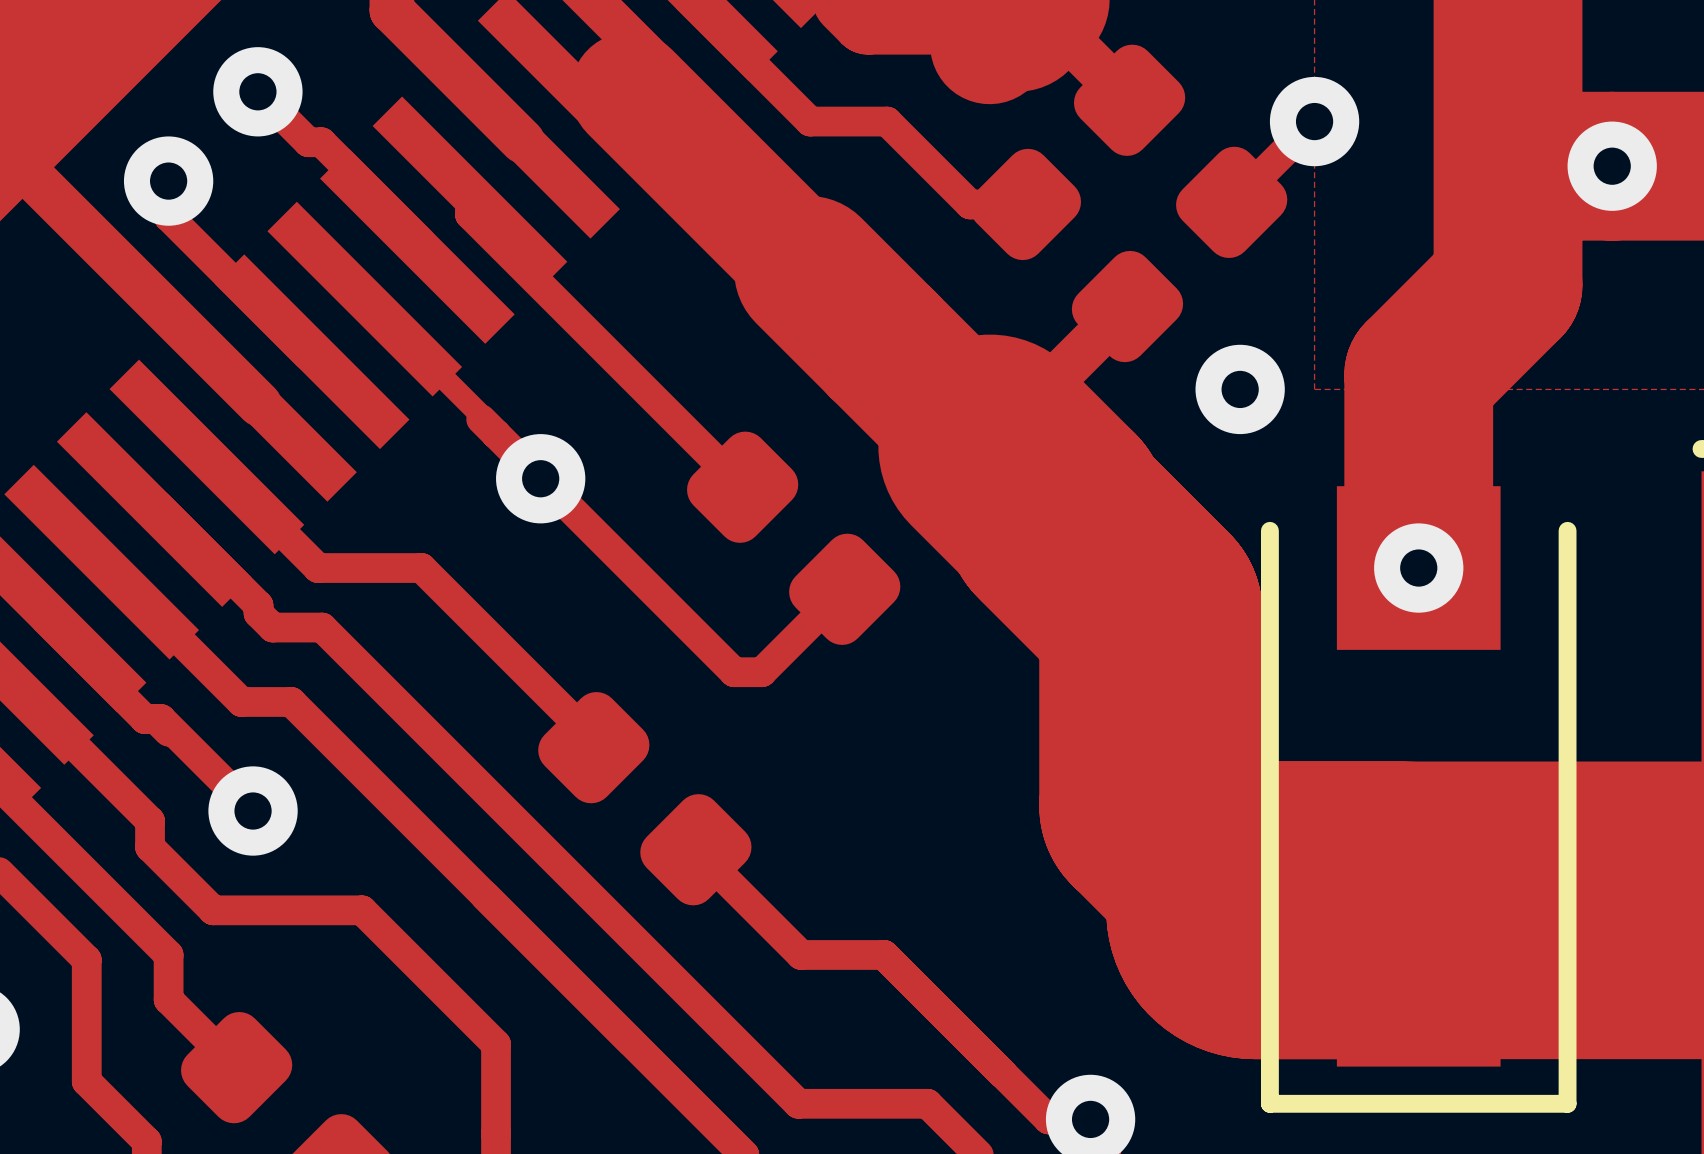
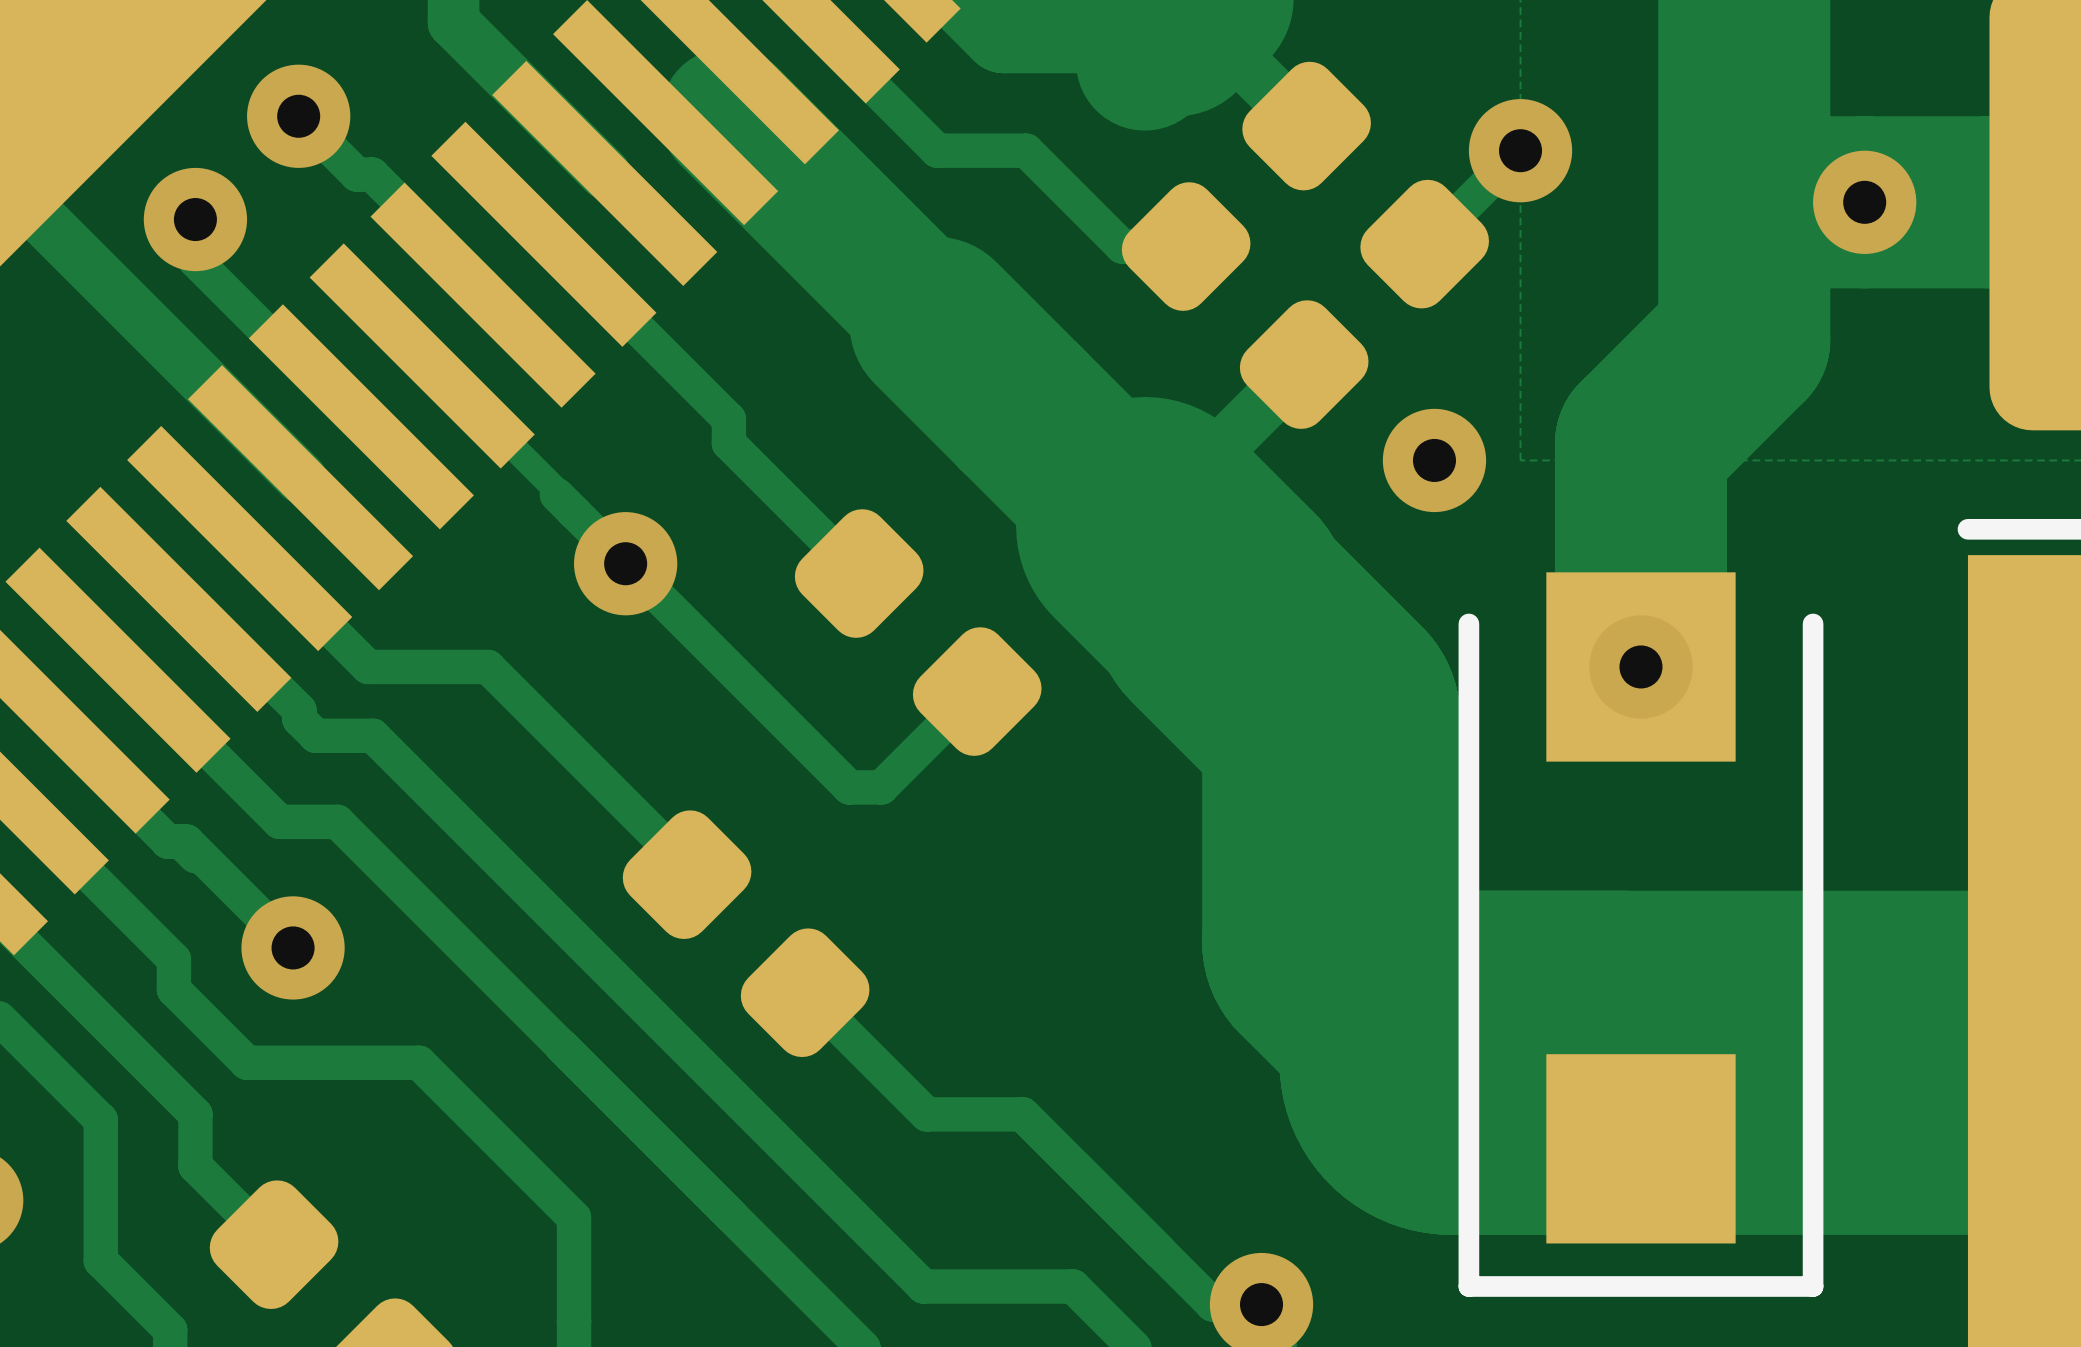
track: (469, 193) (469, 214) (629, 374) -> (543, 234) (728, 419) (728, 443)

